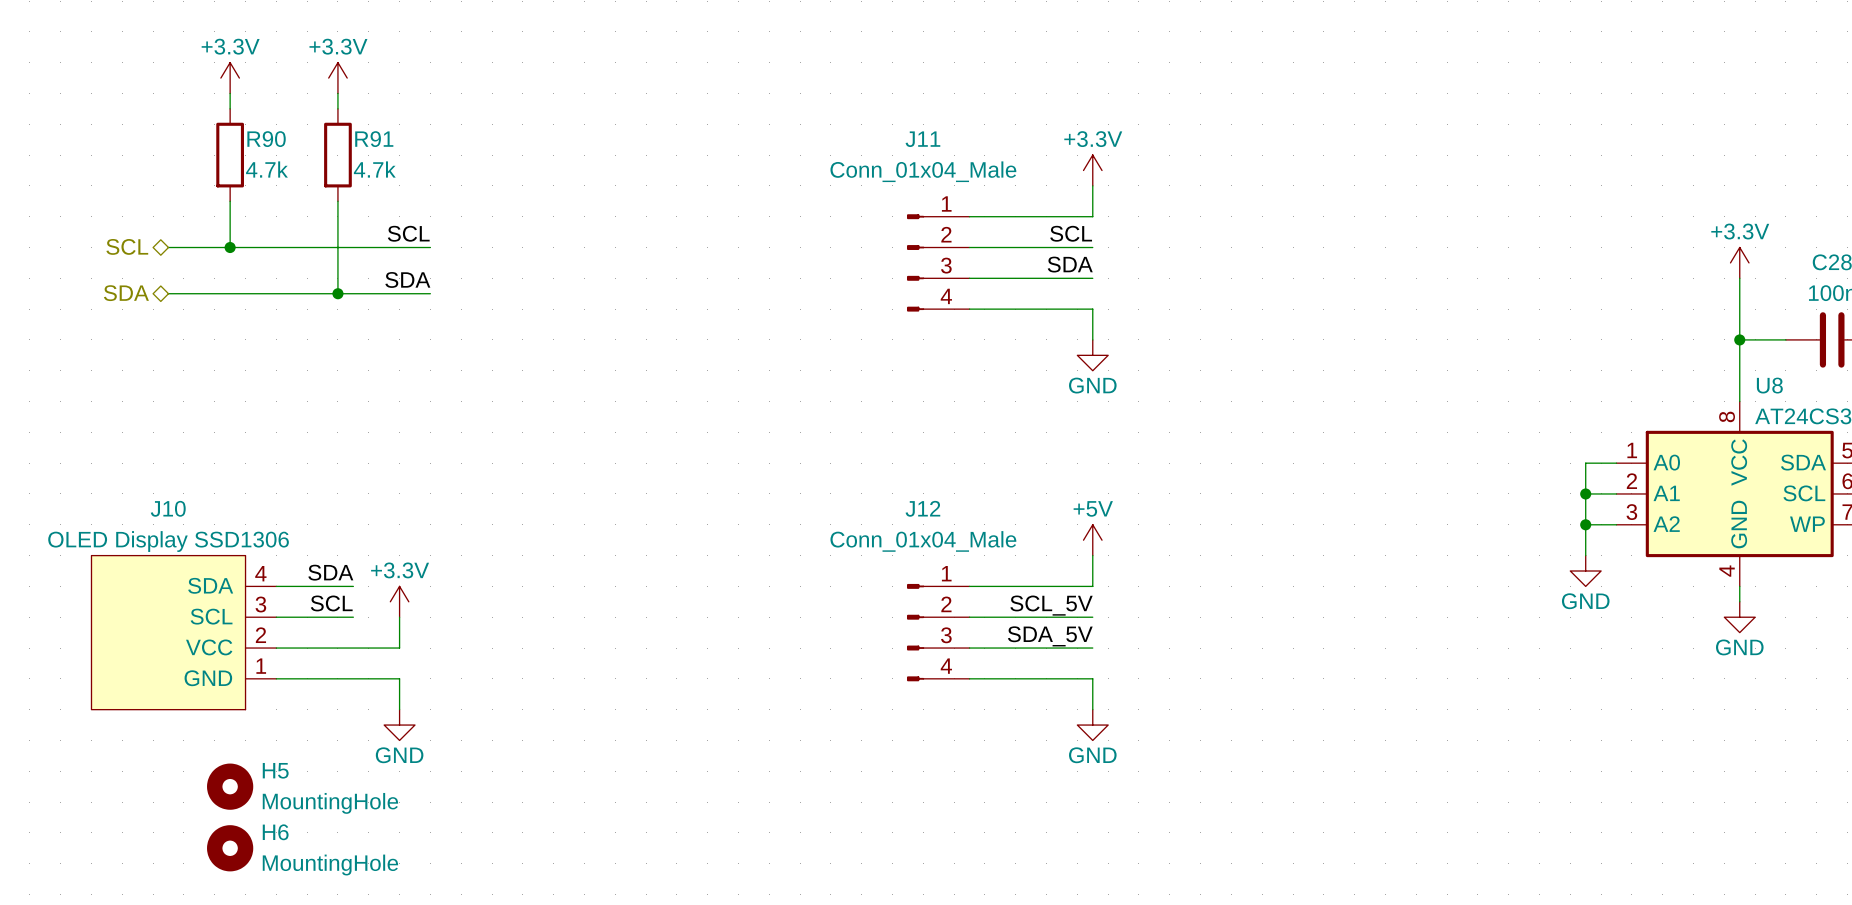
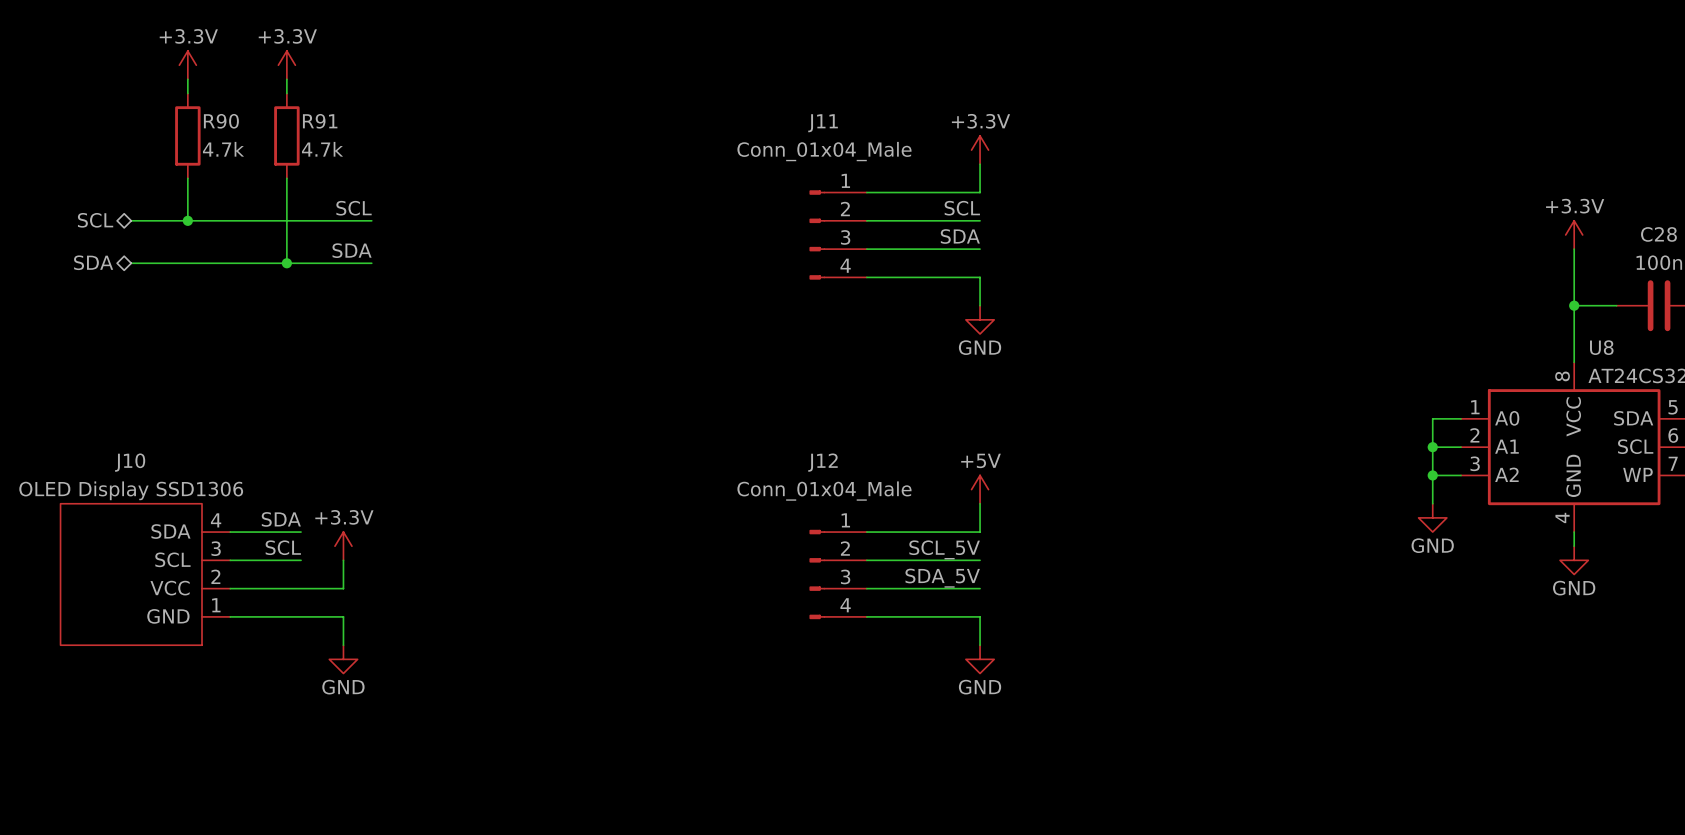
H5: MountingHole (230, 786) -> none
H6: MountingHole (230, 848) -> none

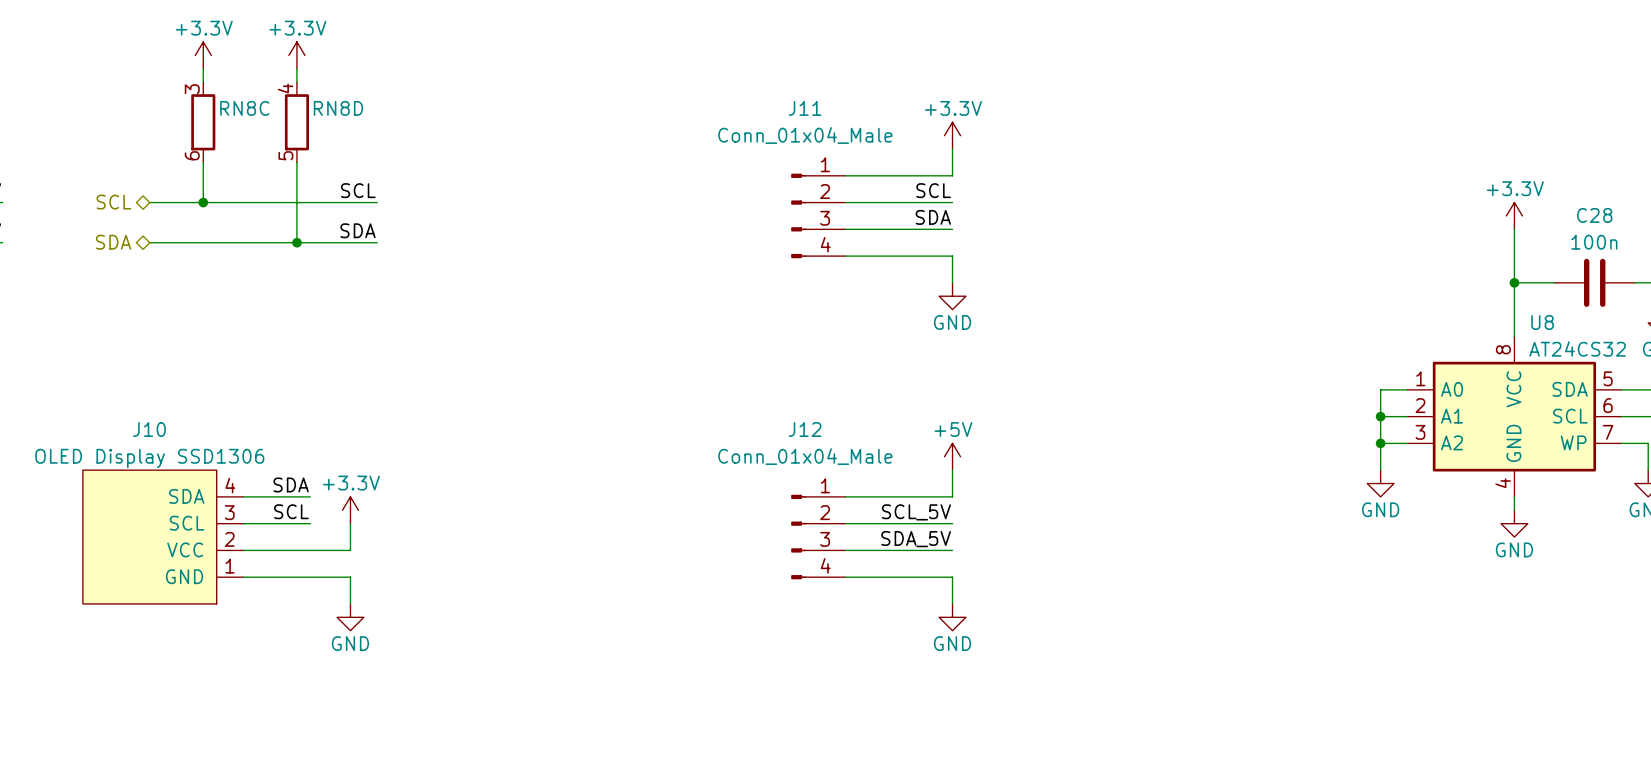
R90 pin number: none -> 3 (192, 89)
R91 pin number: none -> 4 (285, 88)
R90 name: R90 (221, 121) -> RN8C (244, 108)
R91 name: R91 (320, 121) -> RN8D (338, 108)
R90 value: 4.7k (223, 149) -> none
R91 value: 4.7k (322, 149) -> none
R90 pin number: none -> 6 (192, 155)
R91 pin number: none -> 5 (285, 155)

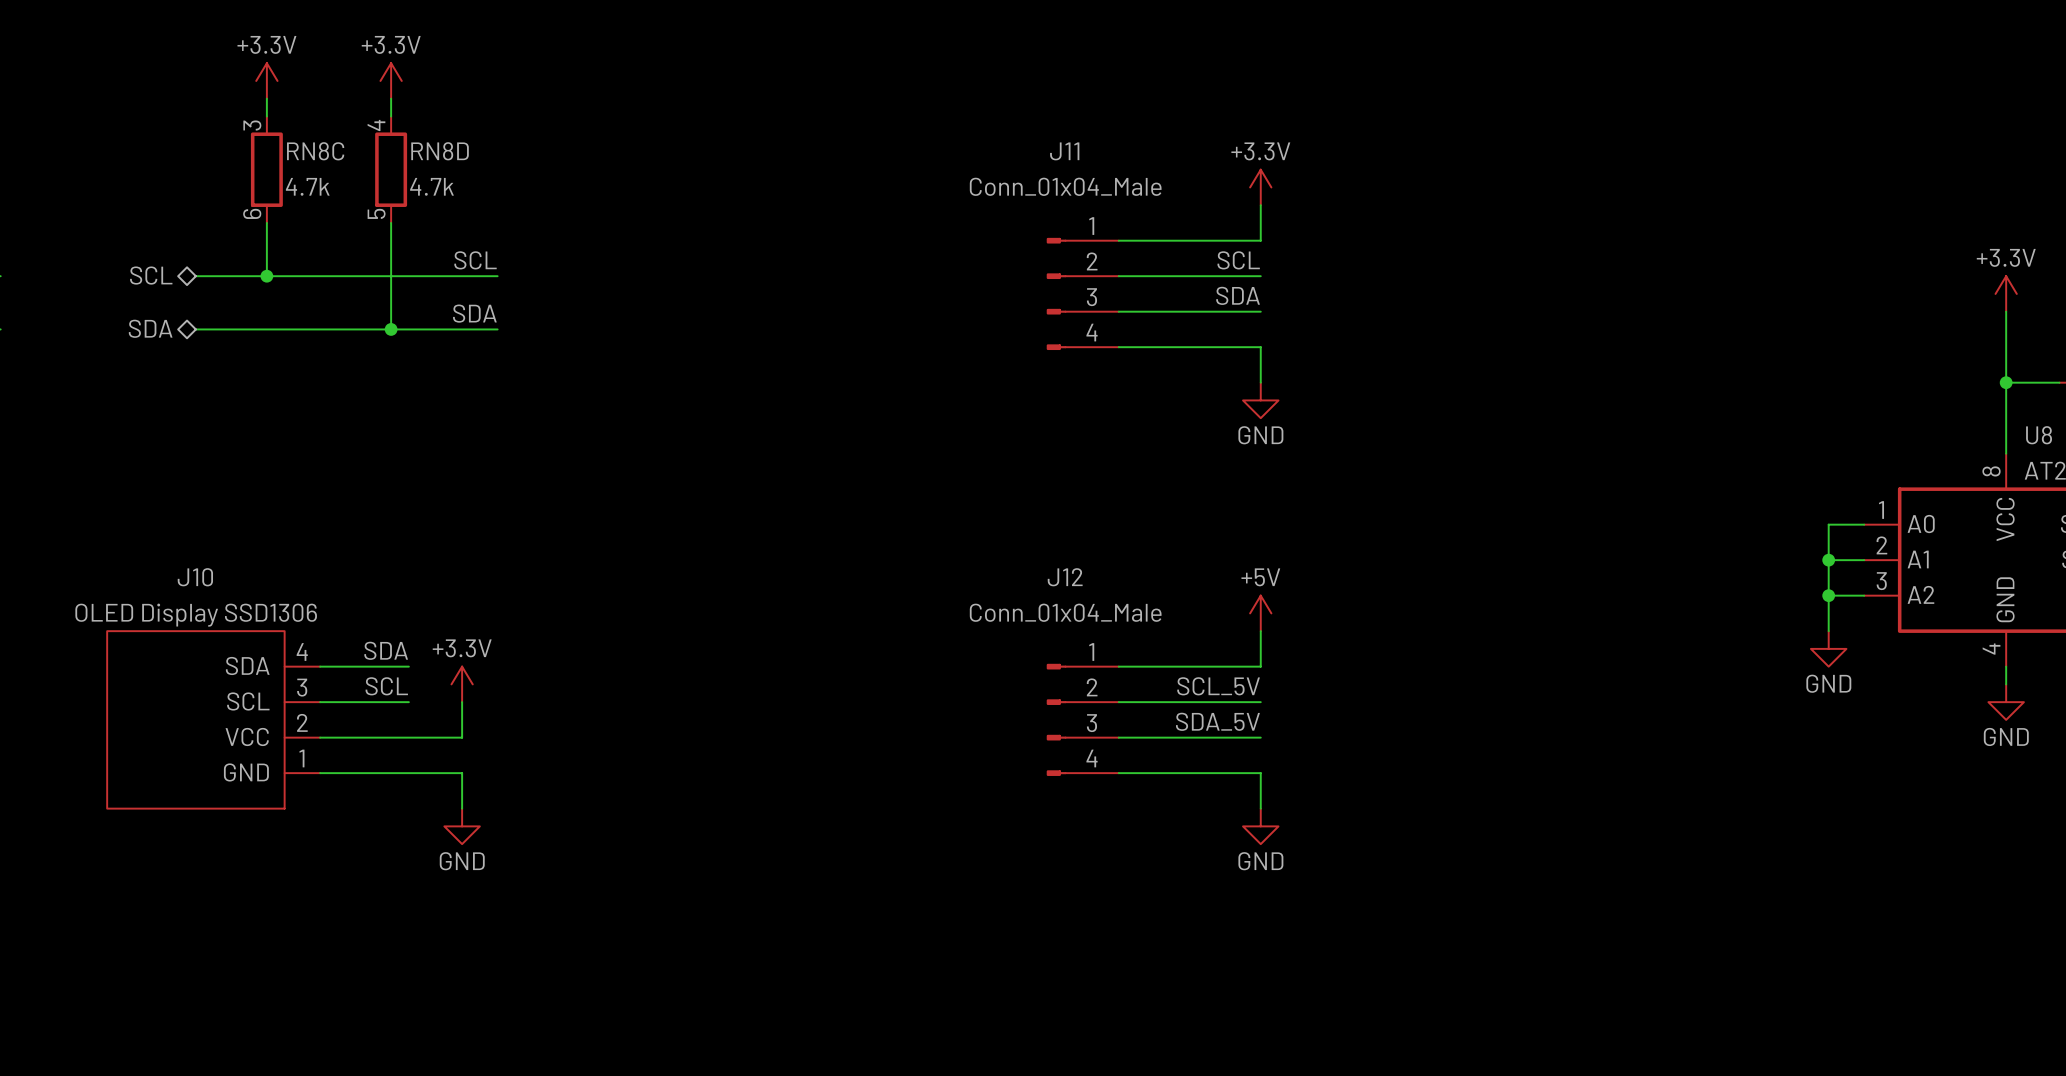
RN8C value: none -> 4.7k (307, 186)
RN8D value: none -> 4.7k (431, 186)

